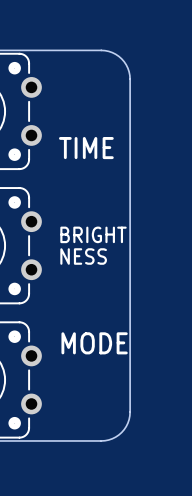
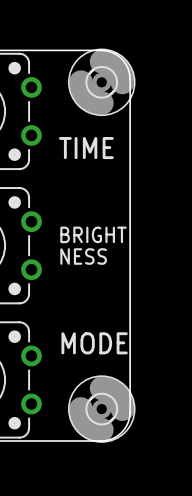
part: none -> (101, 82)
part: none -> (101, 409)

